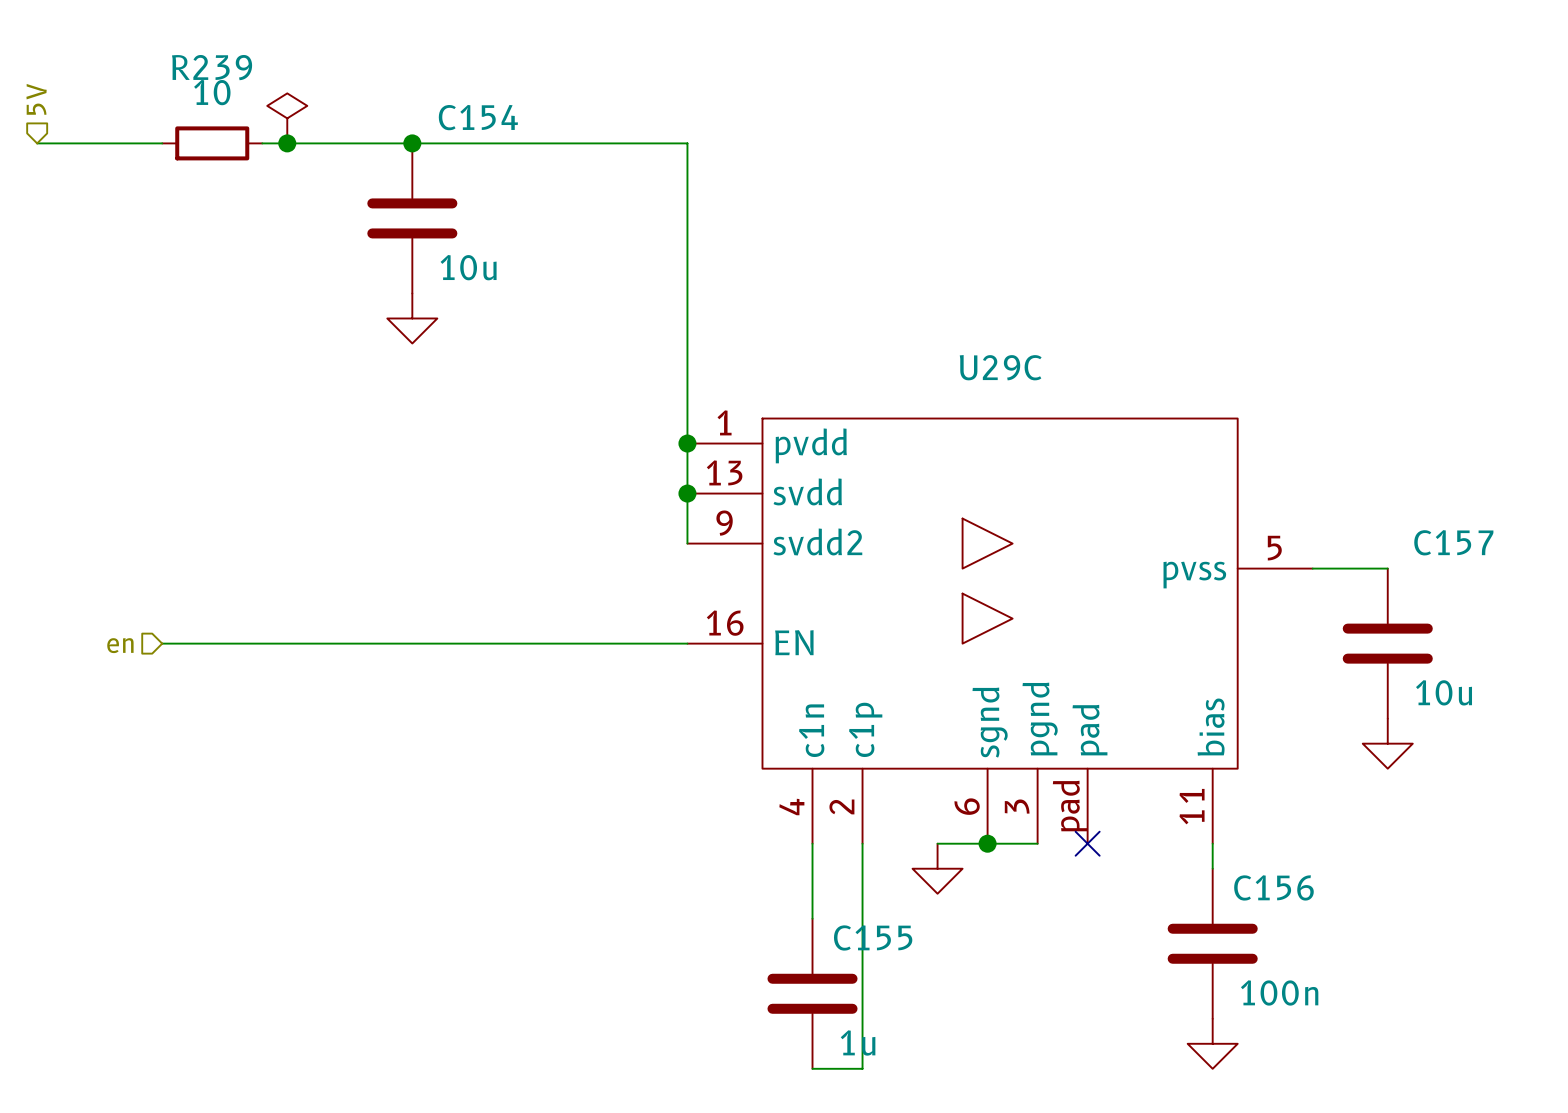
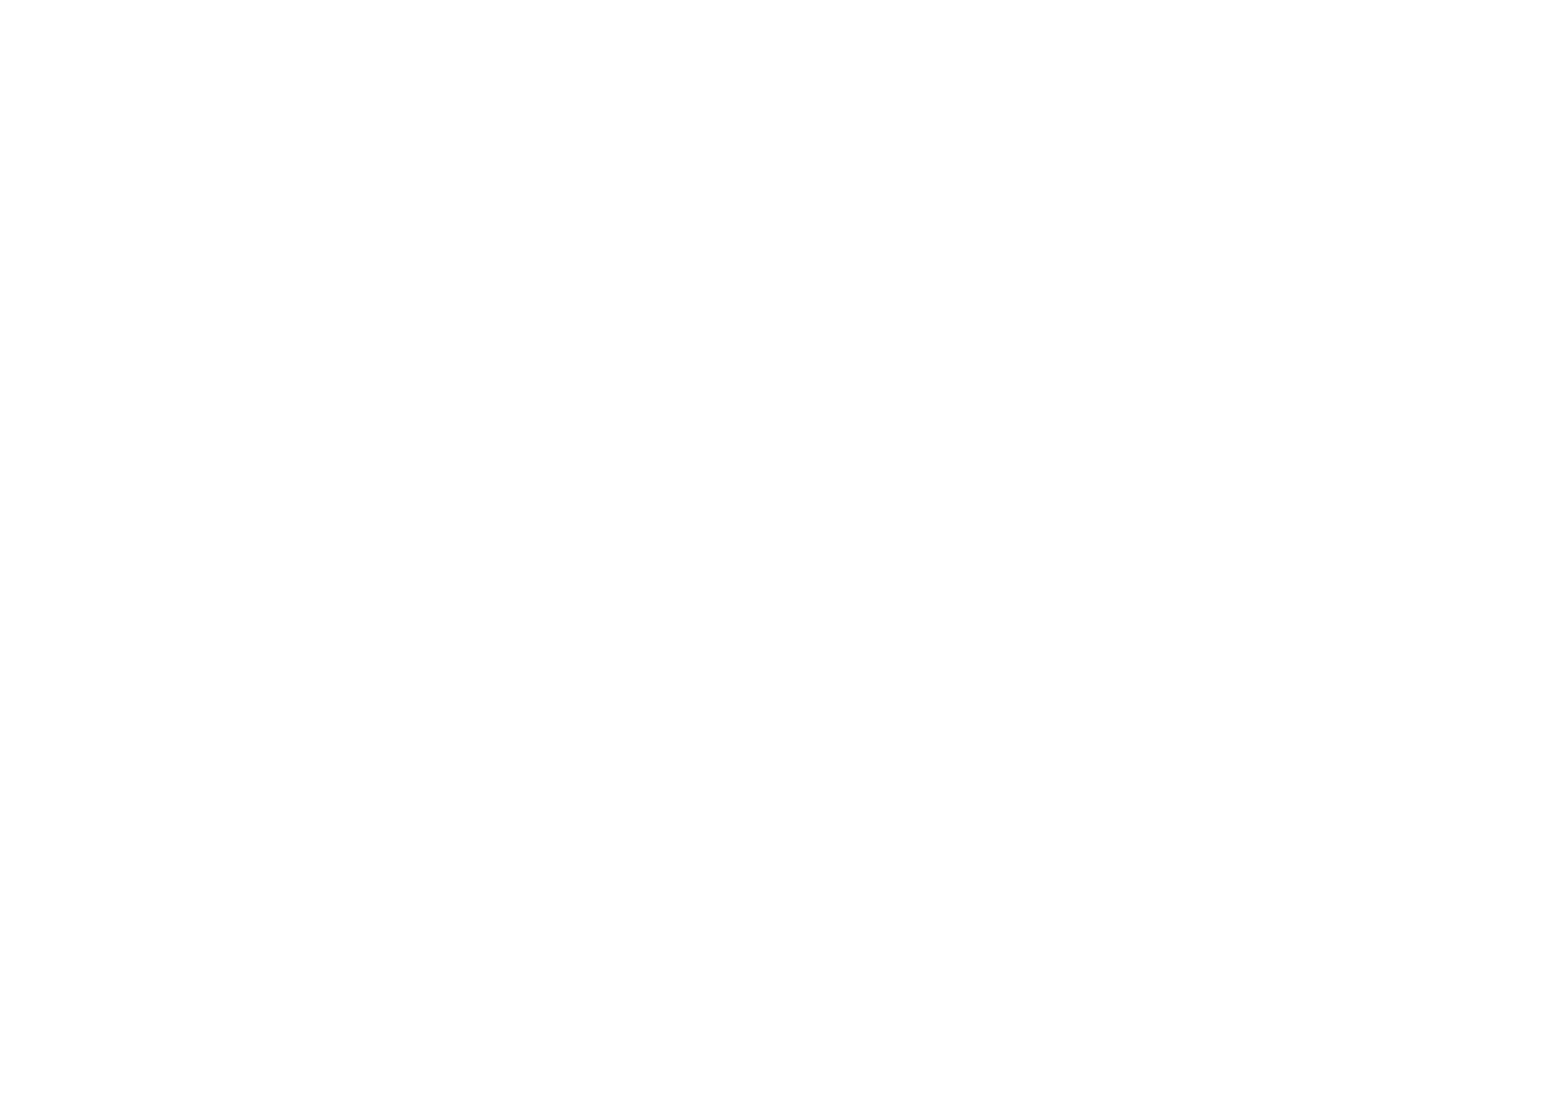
hierarchical label: 5V (36, 99) -> none
power symbol: (287, 118) -> none
wire: (37, 143) (162, 143) -> none
R239: 10 (212, 143) -> none
wire: (262, 143) (687, 143) (687, 543) -> none
junction: (287, 143) -> none
junction: (412, 143) -> none
C154: 10u (412, 218) -> none
power symbol: (412, 318) -> none
junction: (687, 443) -> none
junction: (687, 493) -> none
wire: (1312, 568) (1387, 568) -> none
U29C: (1000, 631) -> none
wire: (162, 643) (687, 643) -> none
C157: 10u (1387, 643) -> none
hierarchical label: en (120, 645) -> none
power symbol: (1387, 743) -> none
wire: (812, 843) (812, 918) -> none
wire: (862, 843) (862, 1068) (812, 1068) -> none
wire: (937, 843) (1037, 843) -> none
junction: (987, 843) -> none
no-connect mark: (1087, 843) -> none
wire: (1212, 843) (1212, 868) -> none
power symbol: (937, 868) -> none
C156: 100n (1212, 943) -> none
C155: 1u (812, 993) -> none
power symbol: (1212, 1043) -> none

